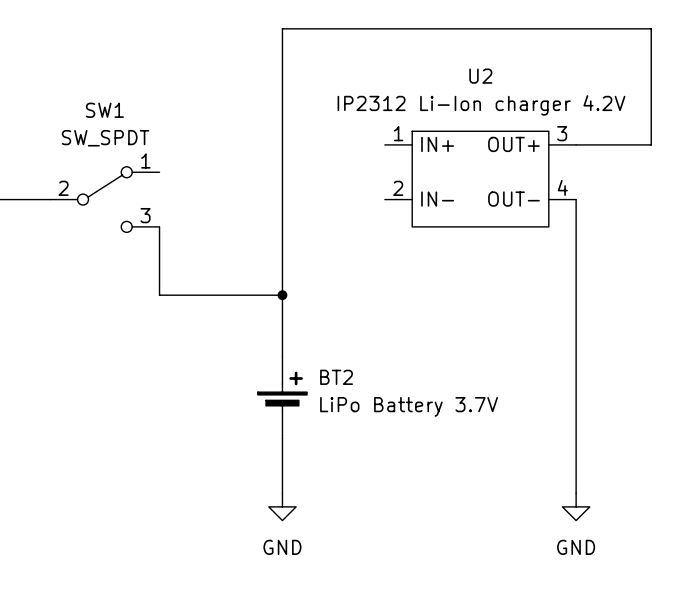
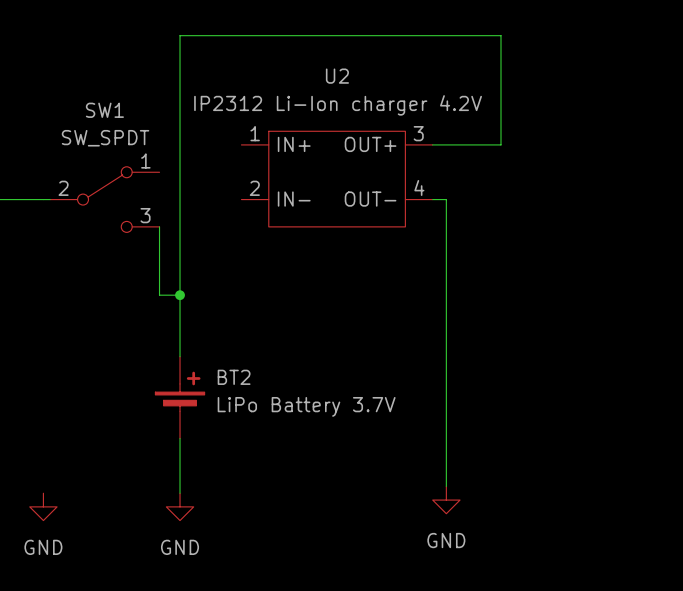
wire: none -> (432, 144) (500, 144) (500, 35) (180, 35) (180, 356)
wire: (576, 144) (651, 144) (651, 28) (282, 28) (282, 356) -> none
U2 position: (480, 179) -> (337, 179)
wire: none -> (432, 199) (446, 199) (446, 486)
wire: (576, 199) (576, 493) -> none
wire: (180, 295) (282, 295) -> none
junction: none -> (180, 295)
junction: (282, 295) -> none
BT2 position: (282, 397) -> (180, 397)
wire: (282, 438) (282, 493) -> (180, 438) (180, 493)
power symbol: none -> GND (446, 500)
power symbol: none -> GND (43, 506)
power symbol: none -> GND (180, 506)
power symbol: GND (282, 506) -> none
power symbol: GND (576, 506) -> none

